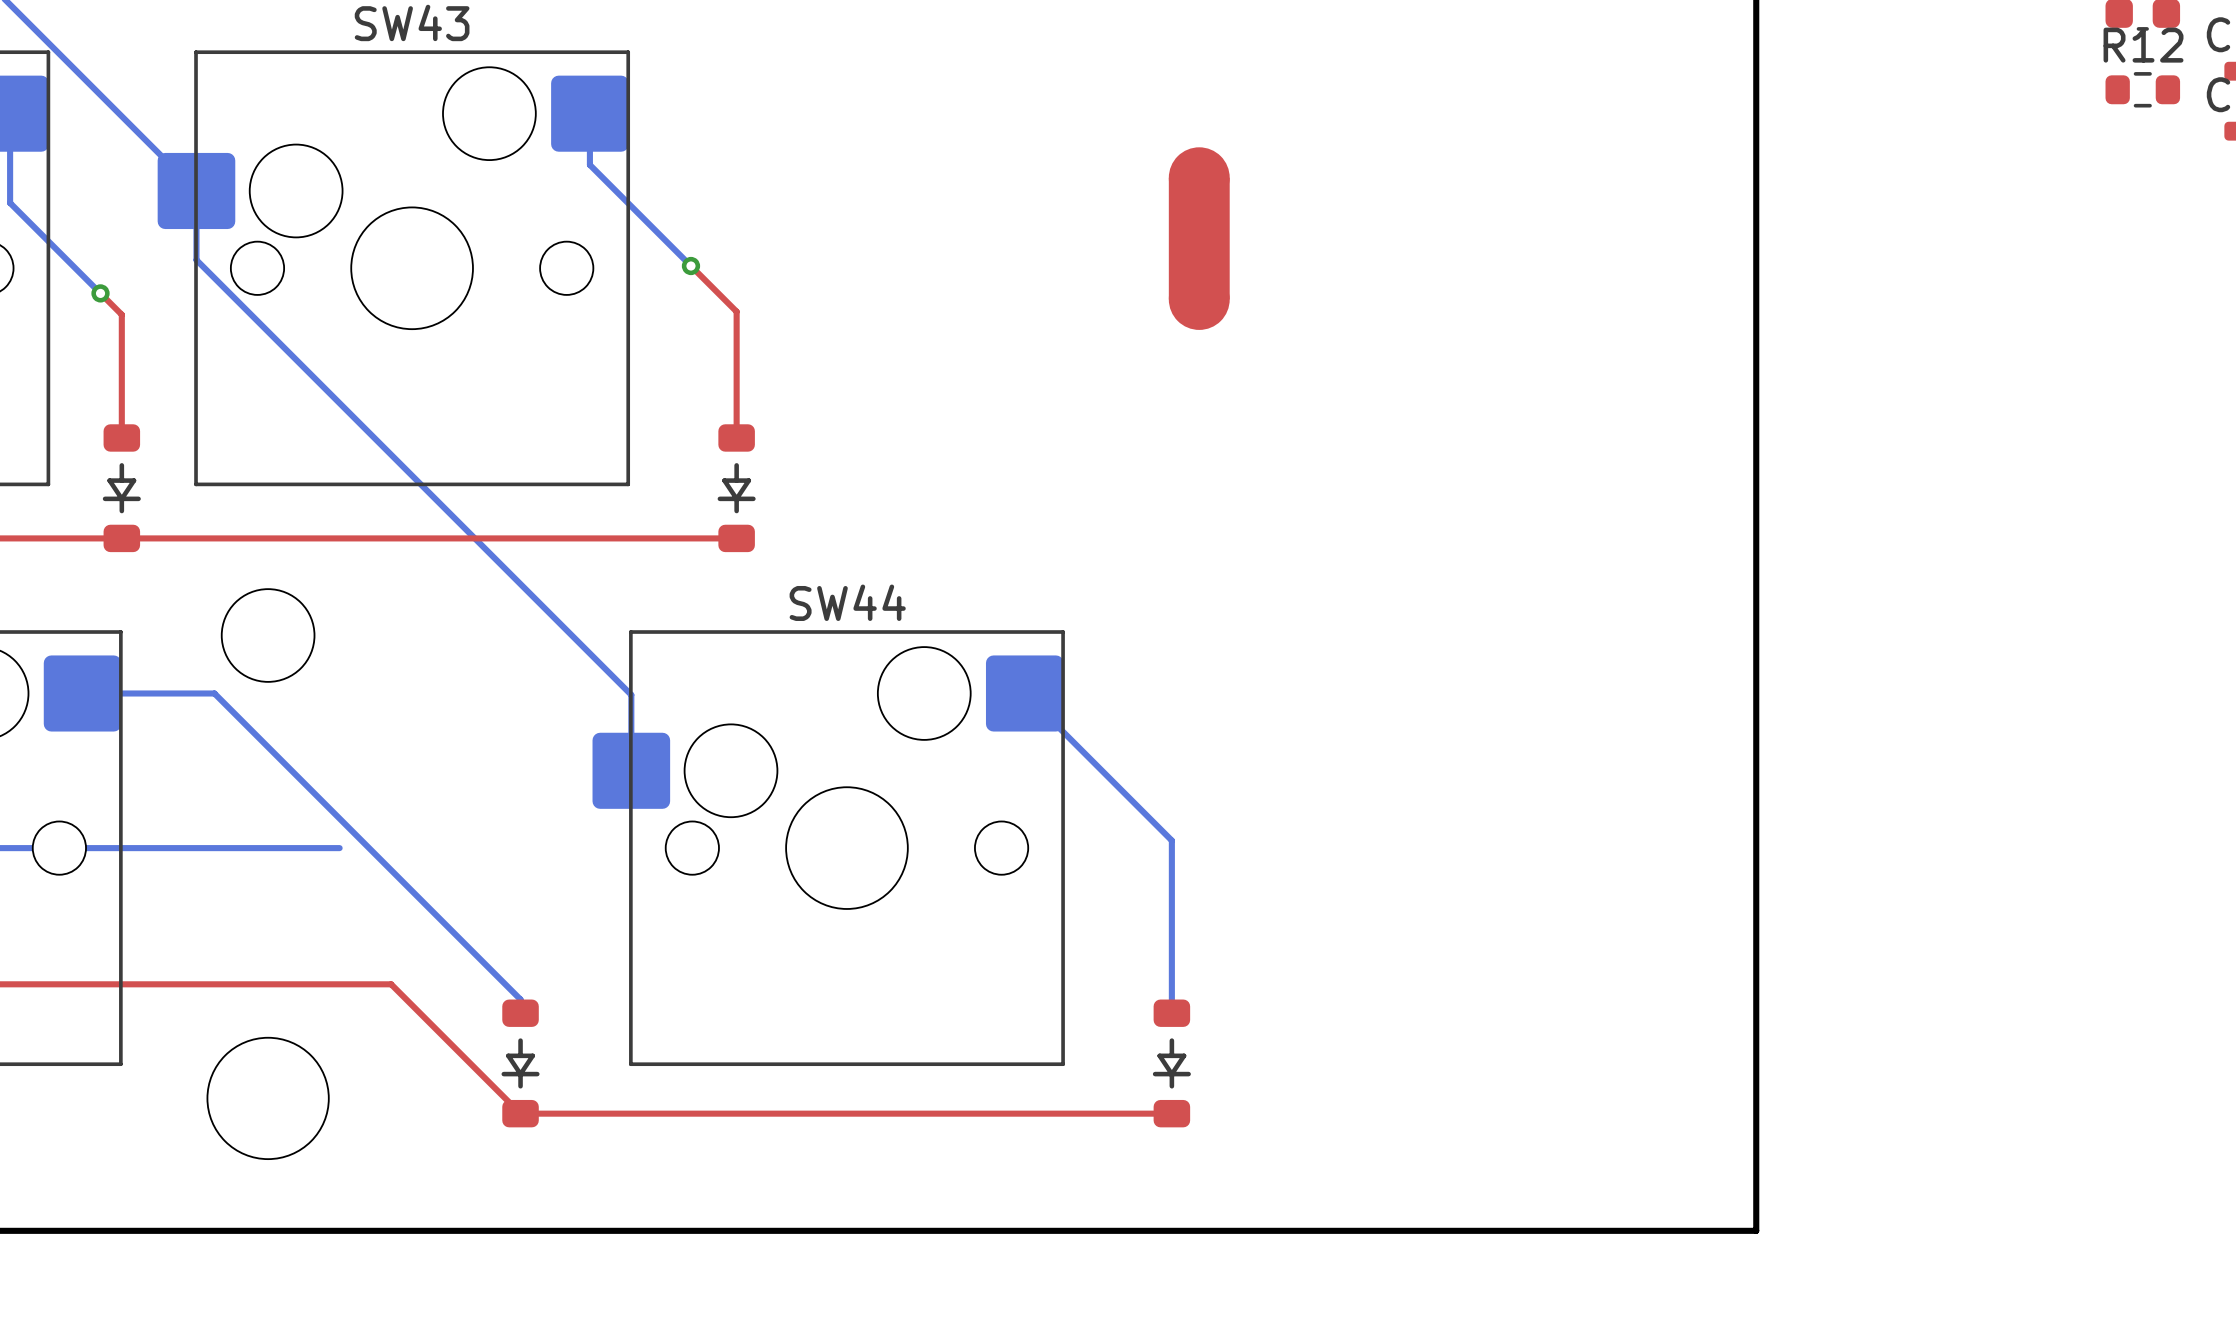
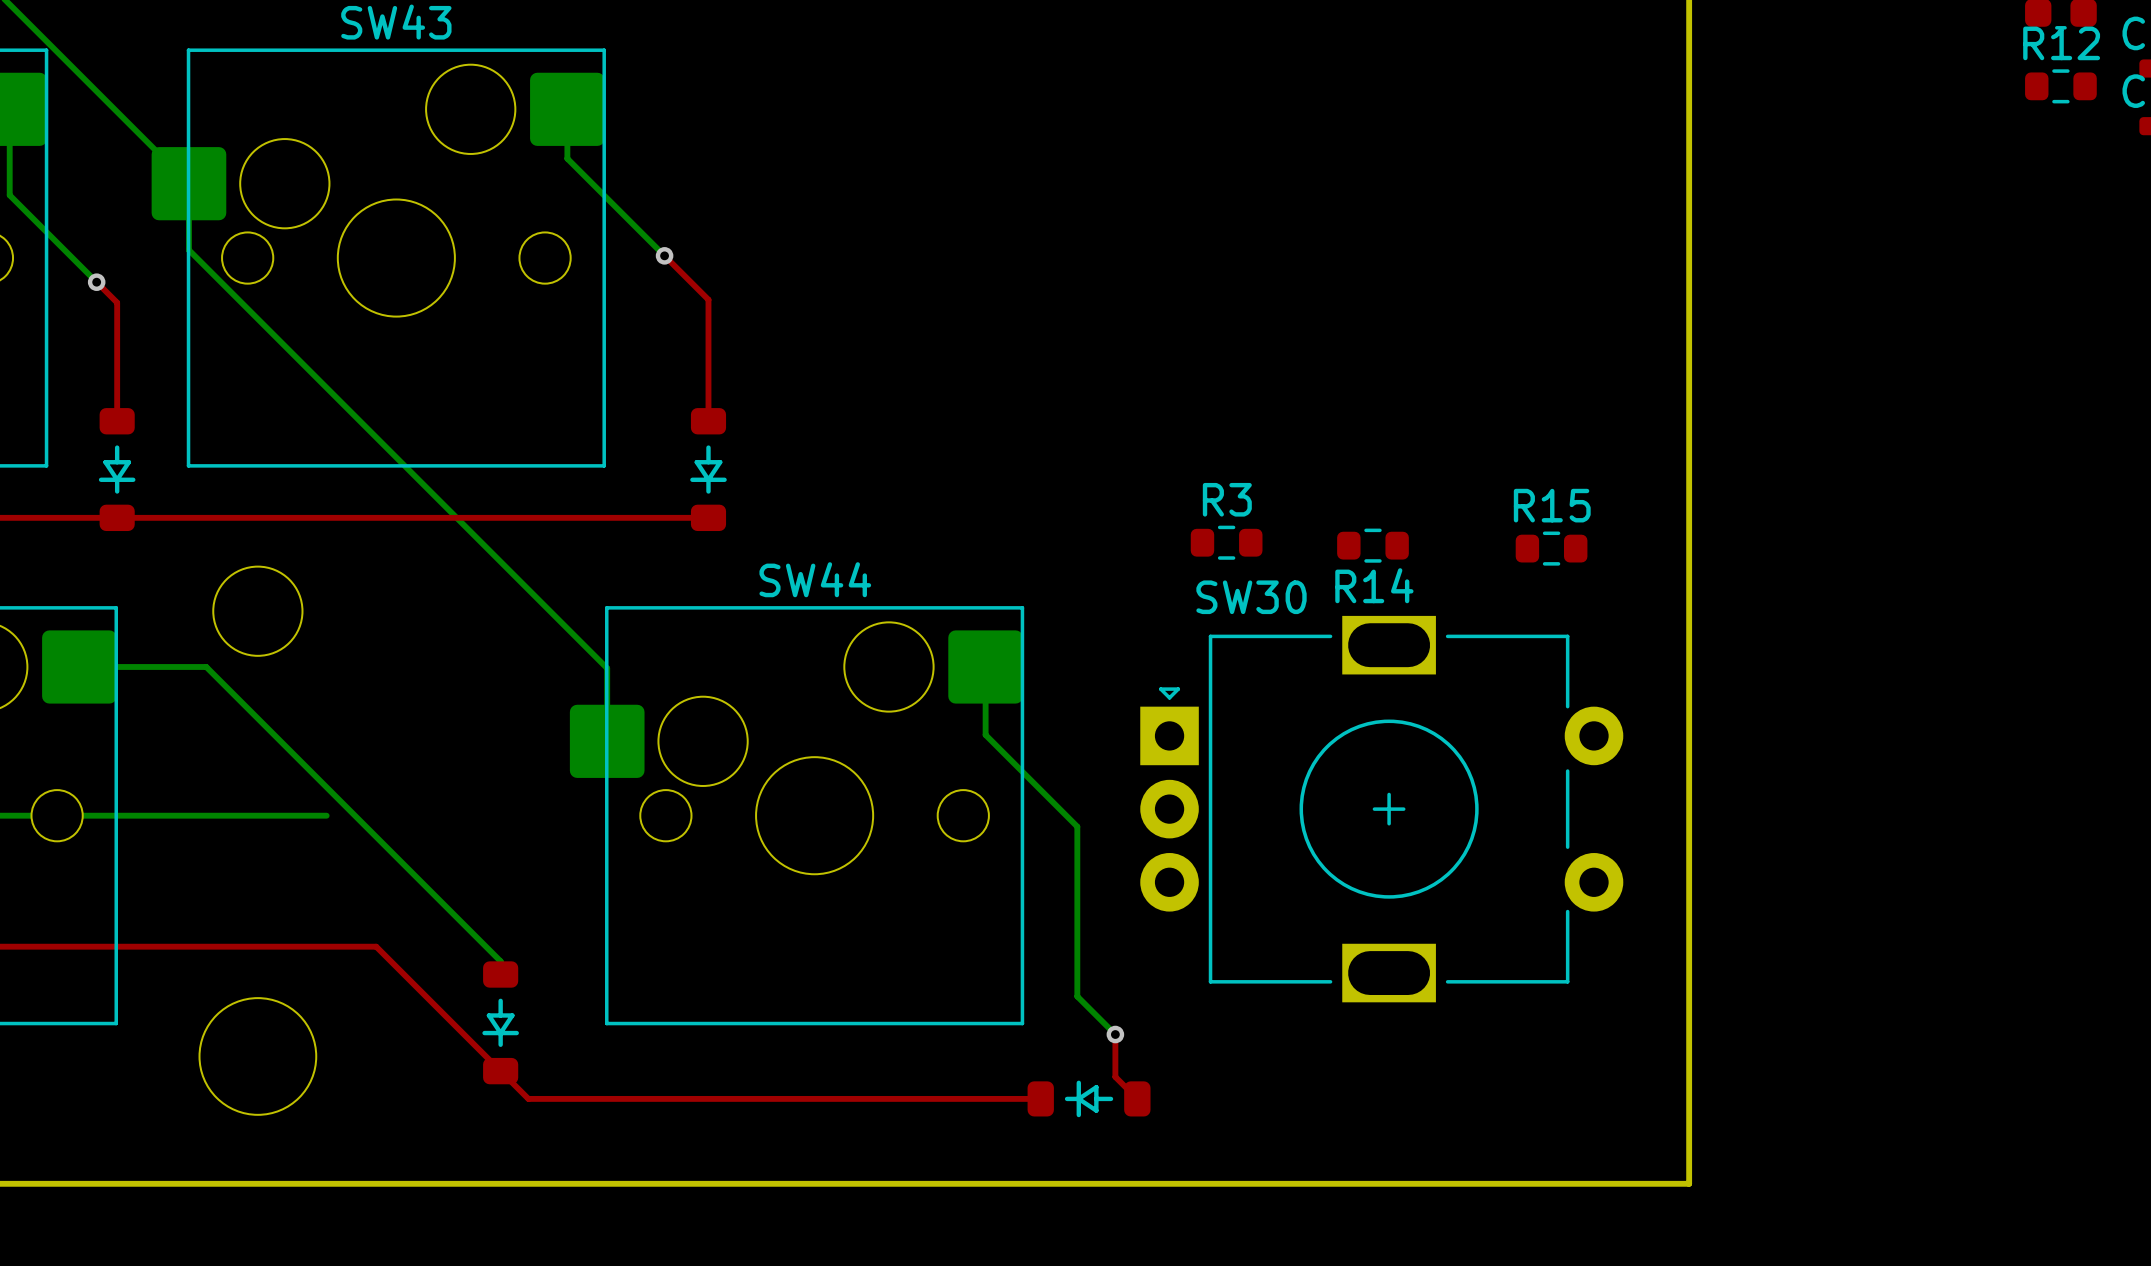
part: (1199, 238) -> none
R3: none -> (1226, 542)
R14: none -> (1372, 545)
R15: none -> (1551, 548)
bottom track: (1024, 693) (1171, 840) (1171, 1013) -> (985, 666) (985, 734) (1077, 826) (1077, 996) (1115, 1034)
SW30: none -> (1381, 809)
part rotation: 0° (1171, 1063) -> 90° clockwise (1089, 1098)
part position: (1171, 1063) -> (1089, 1098)
top track: none -> (1115, 1034) (1115, 1076) (1137, 1098)
via: none -> (1115, 1034)
top track: (520, 1113) (1171, 1113) -> (500, 1071) (528, 1098) (1040, 1098)

